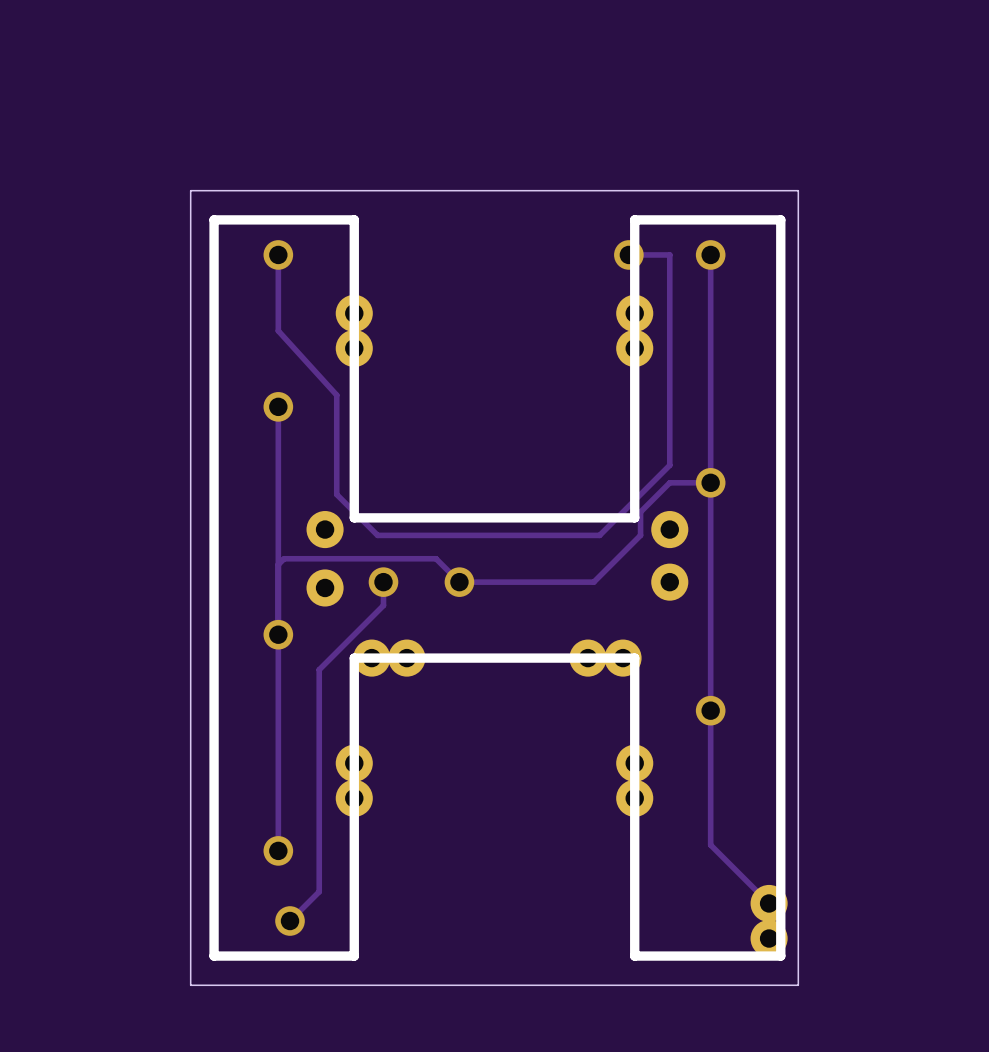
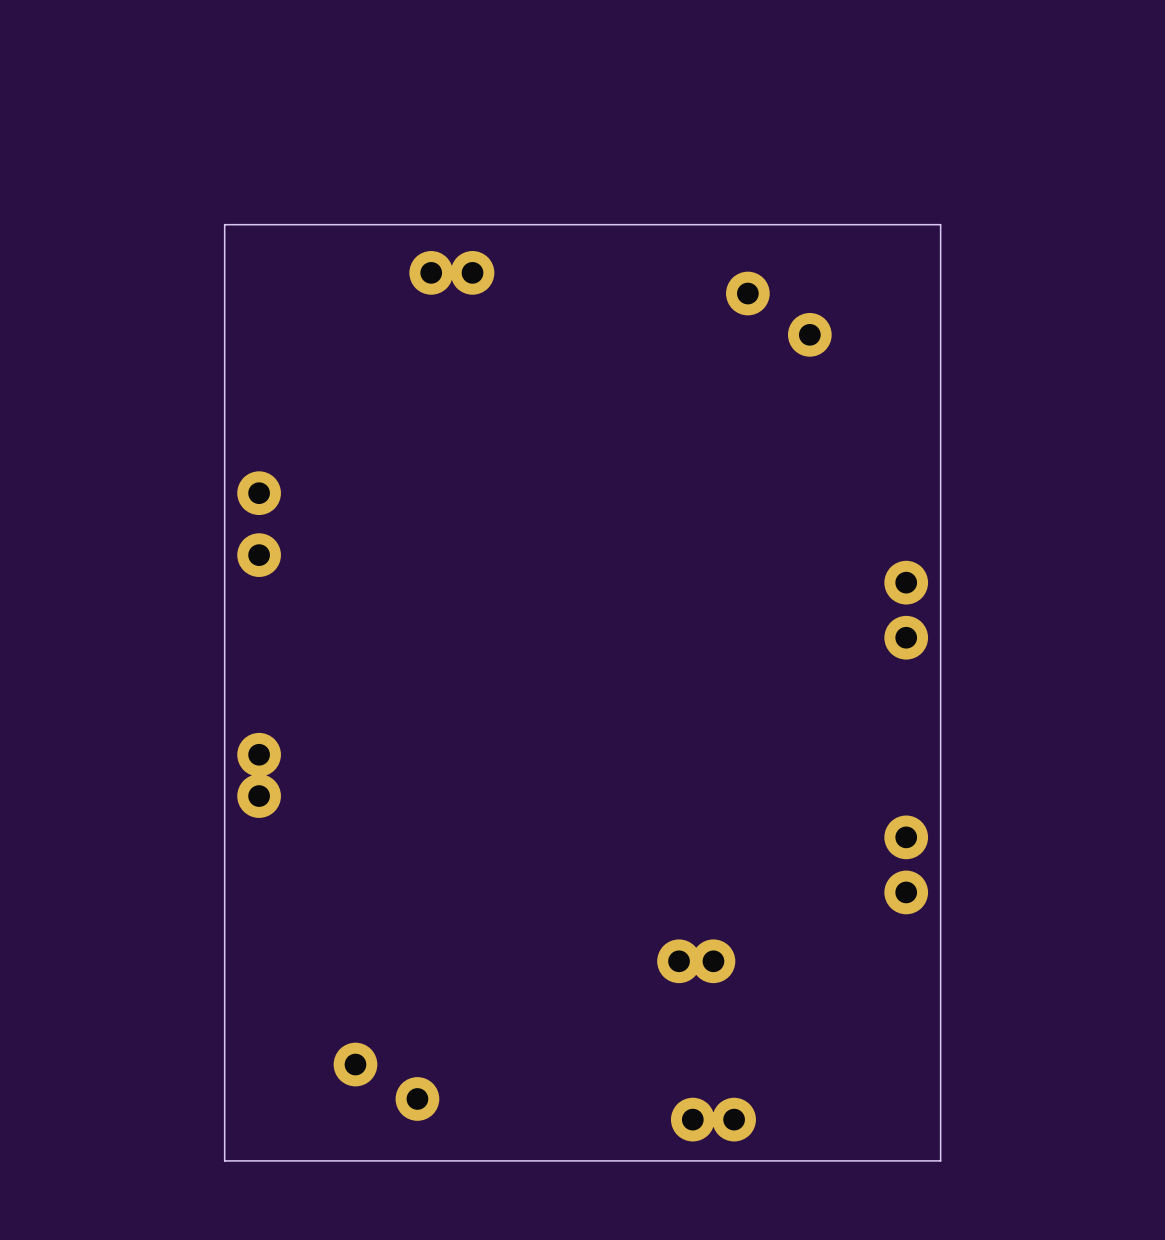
line: (780, 219) (780, 956) (634, 956) (634, 658) (354, 658) (354, 956) (214, 956) (214, 219) (354, 219) (354, 517) (634, 517) (634, 219) (780, 219) -> none
part: none -> (431, 272)
part: none -> (472, 272)
part: none -> (747, 293)
via: (278, 254) -> none
track: (628, 254) (669, 254) (669, 465) (599, 535) (377, 535) (336, 494) (336, 395) (278, 330) (278, 254) -> none
via: (628, 254) -> none
track: (710, 254) (710, 845) (769, 903) -> none
via: (710, 254) -> none
part: none -> (809, 334)
part: (354, 313) -> none
part: (634, 313) -> none
part: (354, 348) -> none
part: (634, 348) -> none
track: (278, 406) (278, 850) -> none
via: (278, 406) -> none
part: none -> (259, 493)
part: none -> (259, 555)
track: (710, 482) (669, 482) (640, 512) (640, 535) (593, 582) (459, 582) (436, 558) (284, 558) (278, 564) -> none
via: (710, 482) -> none
part: none -> (906, 582)
part: (325, 529) -> none
part: (669, 529) -> none
part: none -> (906, 637)
track: (383, 582) (383, 605) (319, 669) (319, 891) (290, 921) -> none
via: (383, 582) -> none
via: (459, 582) -> none
part: (669, 582) -> none
part: (325, 587) -> none
via: (278, 634) -> none
part: none -> (259, 754)
part: (371, 658) -> none
part: (406, 658) -> none
part: (587, 658) -> none
part: (623, 658) -> none
part: none -> (259, 796)
via: (710, 710) -> none
part: none -> (906, 837)
part: none -> (906, 892)
part: (354, 763) -> none
part: (634, 763) -> none
part: (354, 798) -> none
part: (634, 798) -> none
part: none -> (679, 961)
part: none -> (713, 961)
via: (278, 850) -> none
part: none -> (355, 1064)
part: (769, 903) -> none
via: (290, 921) -> none
part: none -> (417, 1098)
part: (769, 938) -> none
part: none -> (692, 1119)
part: none -> (734, 1119)

